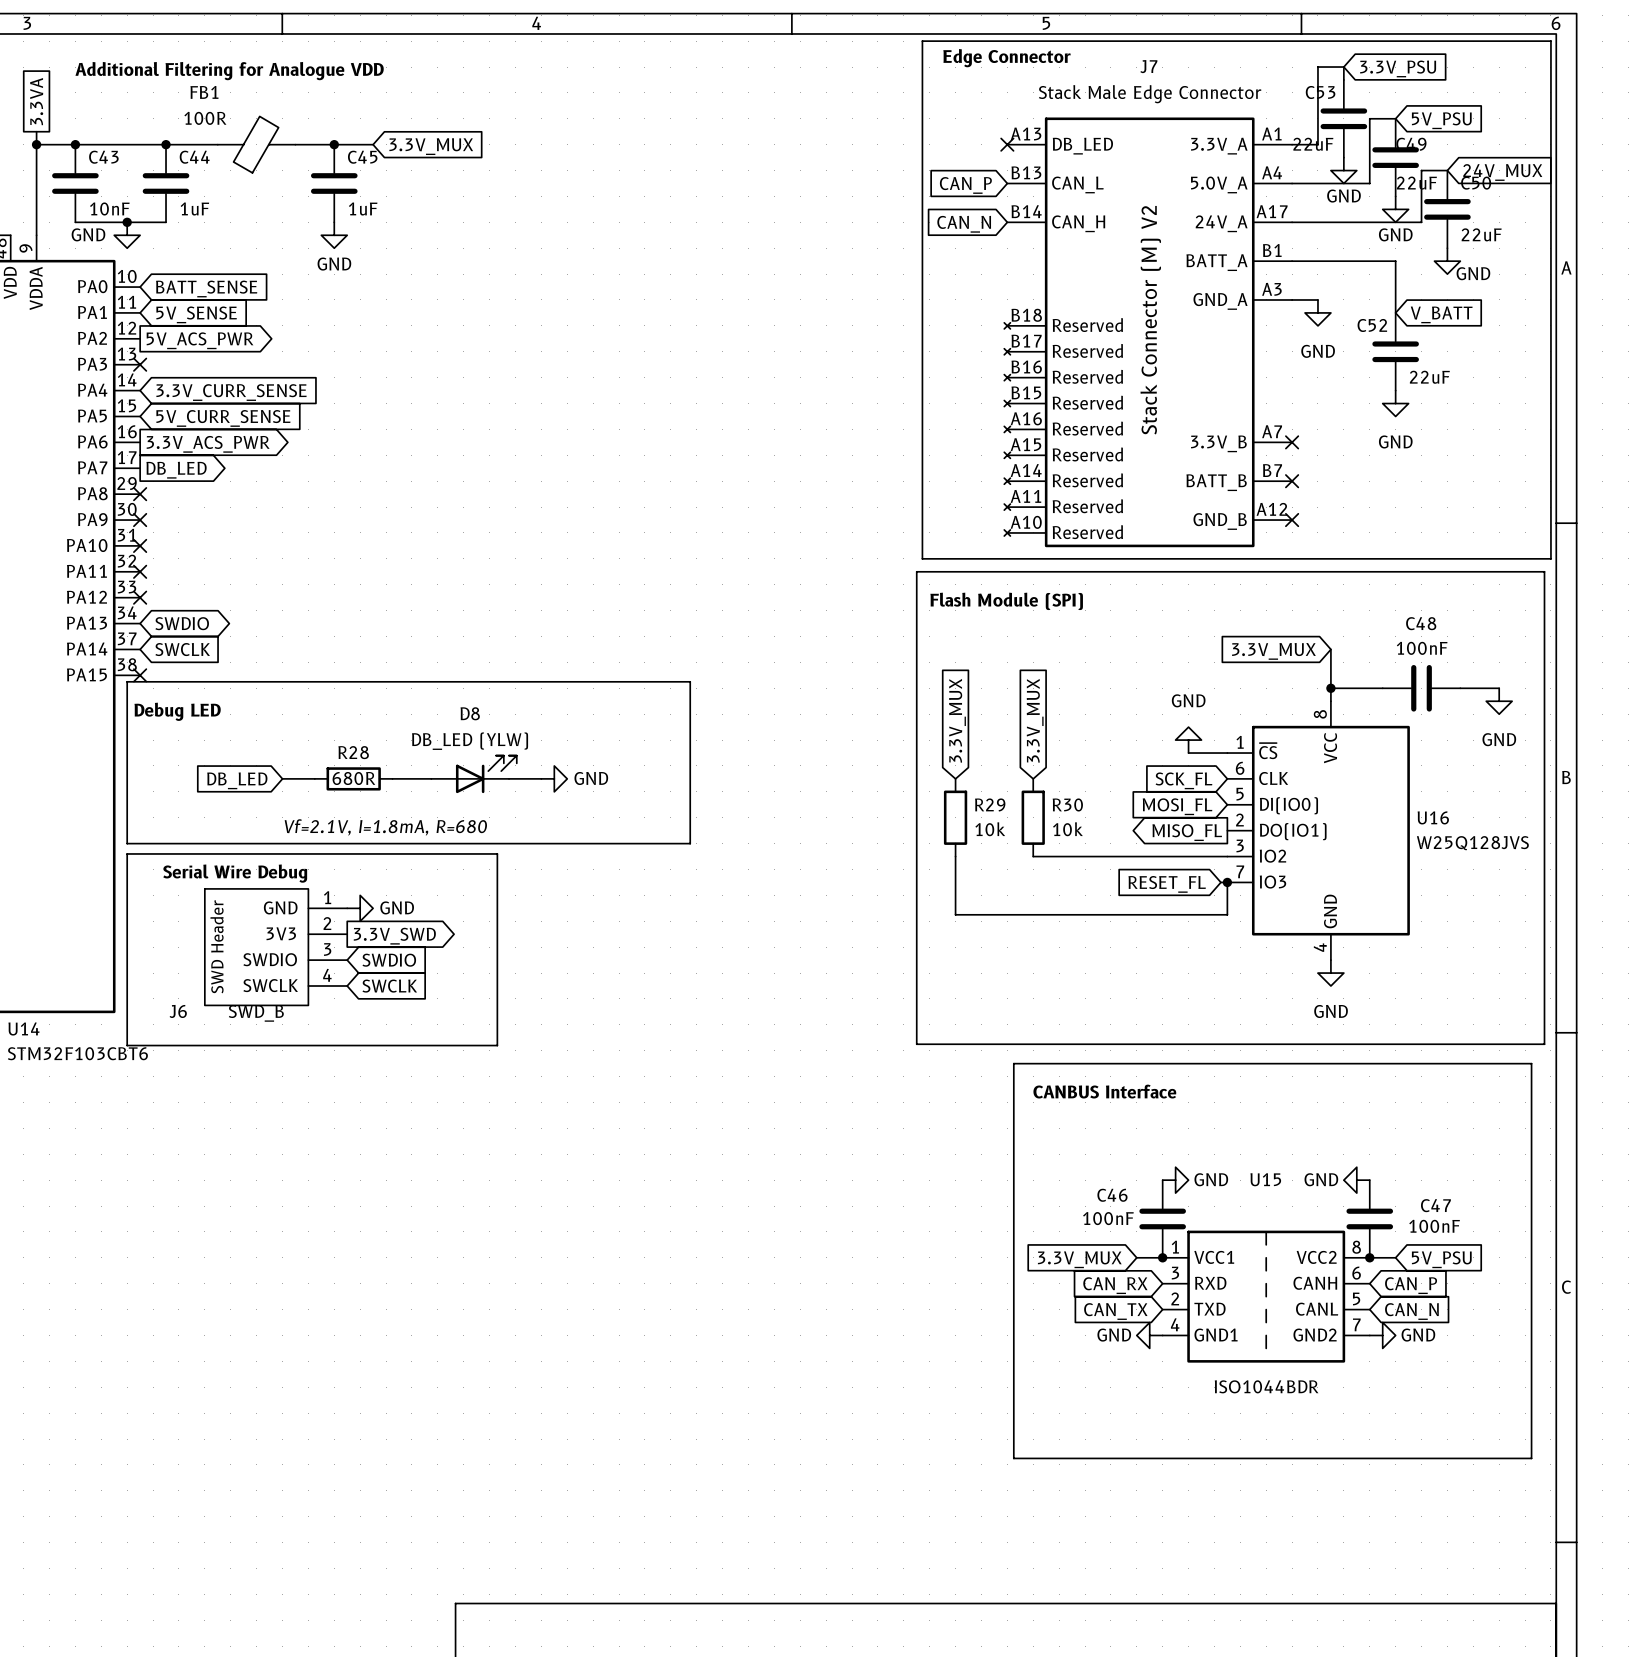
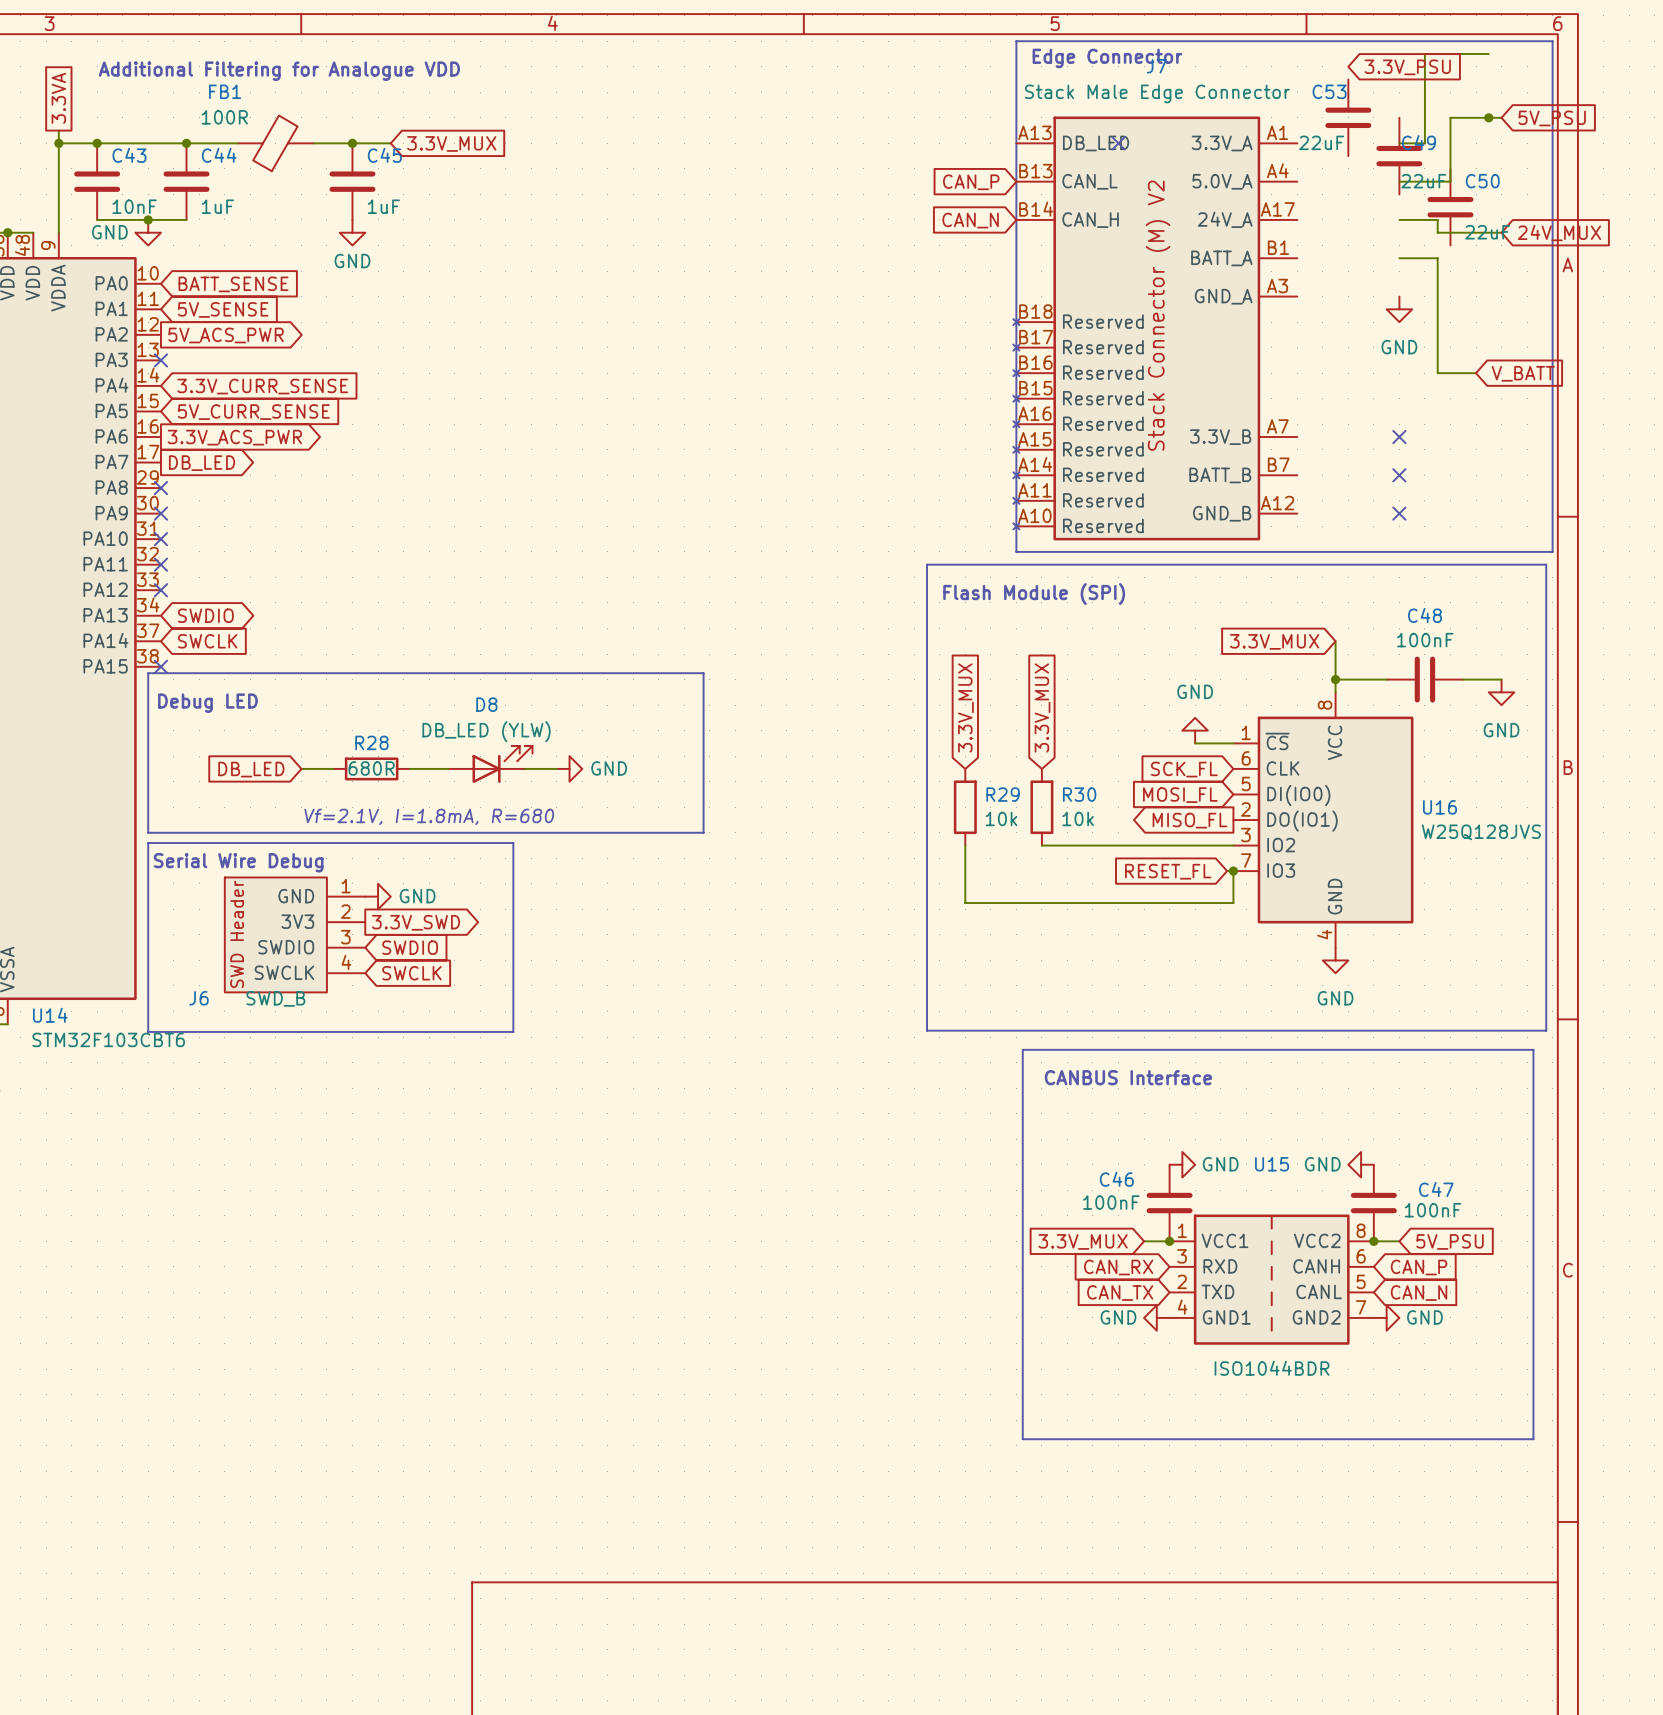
line: (1007, 41) (922, 41) (922, 558) (1007, 558) -> (1016, 41) (1016, 551)
wire: none -> (1488, 53) (1424, 53) (1424, 143) (1399, 143)
text position: Edge Connector (1006, 58) -> Edge Connector (1107, 58)
wire: (1343, 79) (1343, 67) (1317, 67) (1317, 144) (1292, 144) -> none
wire: (1395, 118) (1369, 118) (1369, 183) (1292, 183) -> none
junction: none -> (1488, 117)
wire: none -> (1501, 117) (1450, 117) (1450, 181) (1399, 181)
global label position: 5V_PSU (1441, 120) -> 5V_PSU (1552, 118)
no-connect mark: (1007, 144) -> none
no-connect mark: none -> (1118, 143)
power symbol: GND (1343, 170) -> none
wire: (1447, 170) (1421, 170) (1421, 222) -> (1501, 232) (1437, 232) (1437, 219) (1424, 219)
global label position: 24V_MUX (1502, 172) -> 24V_MUX (1559, 233)
power symbol: GND (1395, 209) -> none
wire: (1292, 222) (1395, 222) -> none
wire: (1292, 261) (1395, 261) (1395, 312) -> none
wire: none -> (1399, 258) (1437, 258) (1437, 373) (1476, 373)
power symbol: GND (1447, 261) -> none
wire: (1292, 299) (1317, 299) -> none
power symbol: GND (1317, 312) -> none
power symbol: none -> GND (1399, 309)
global label position: V_BATT (1441, 314) -> V_BATT (1523, 373)
C52: 22uF (1395, 351) -> none
power symbol: GND (1395, 403) -> none
no-connect mark: (1292, 442) -> none
no-connect mark: none -> (1399, 437)
no-connect mark: (1292, 481) -> none
no-connect mark: none -> (1399, 475)
no-connect mark: (1292, 520) -> none
no-connect mark: none -> (1399, 513)

